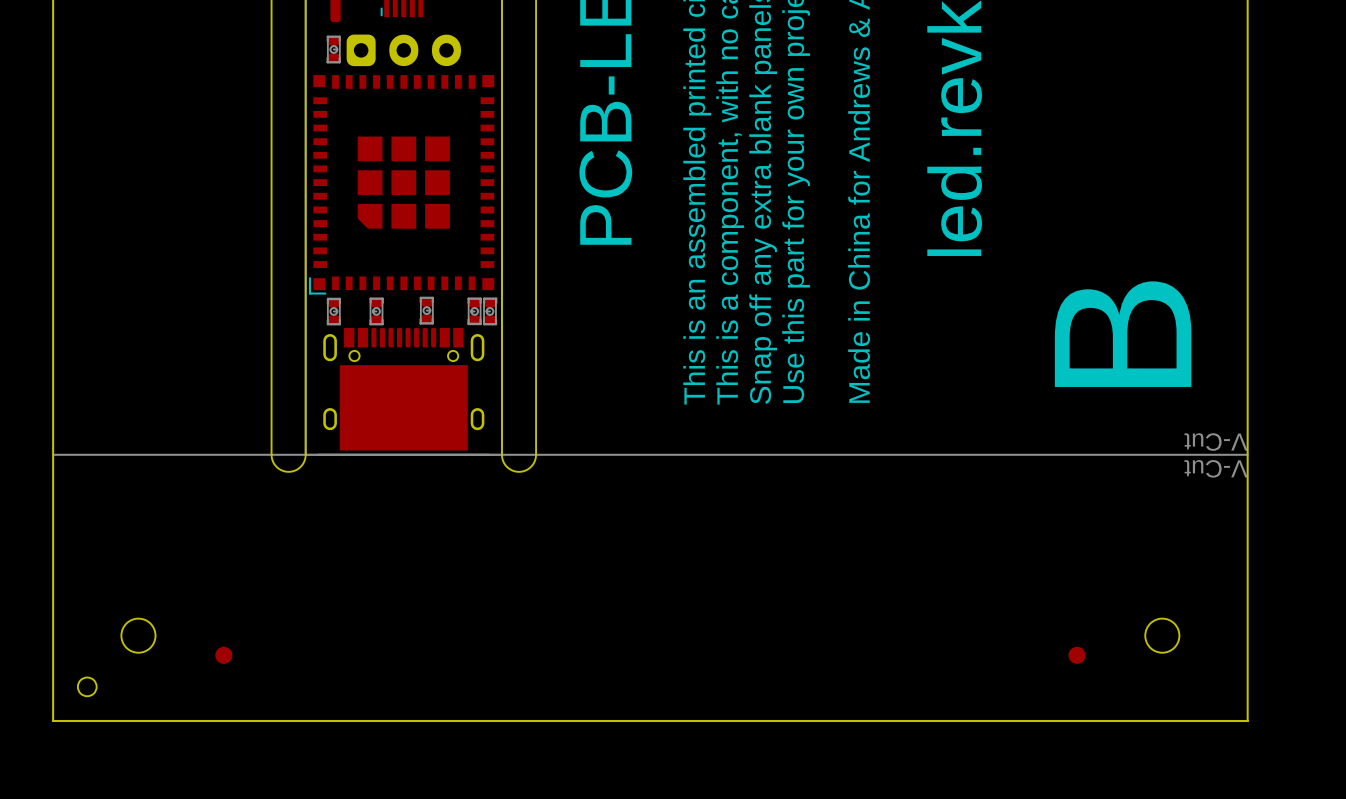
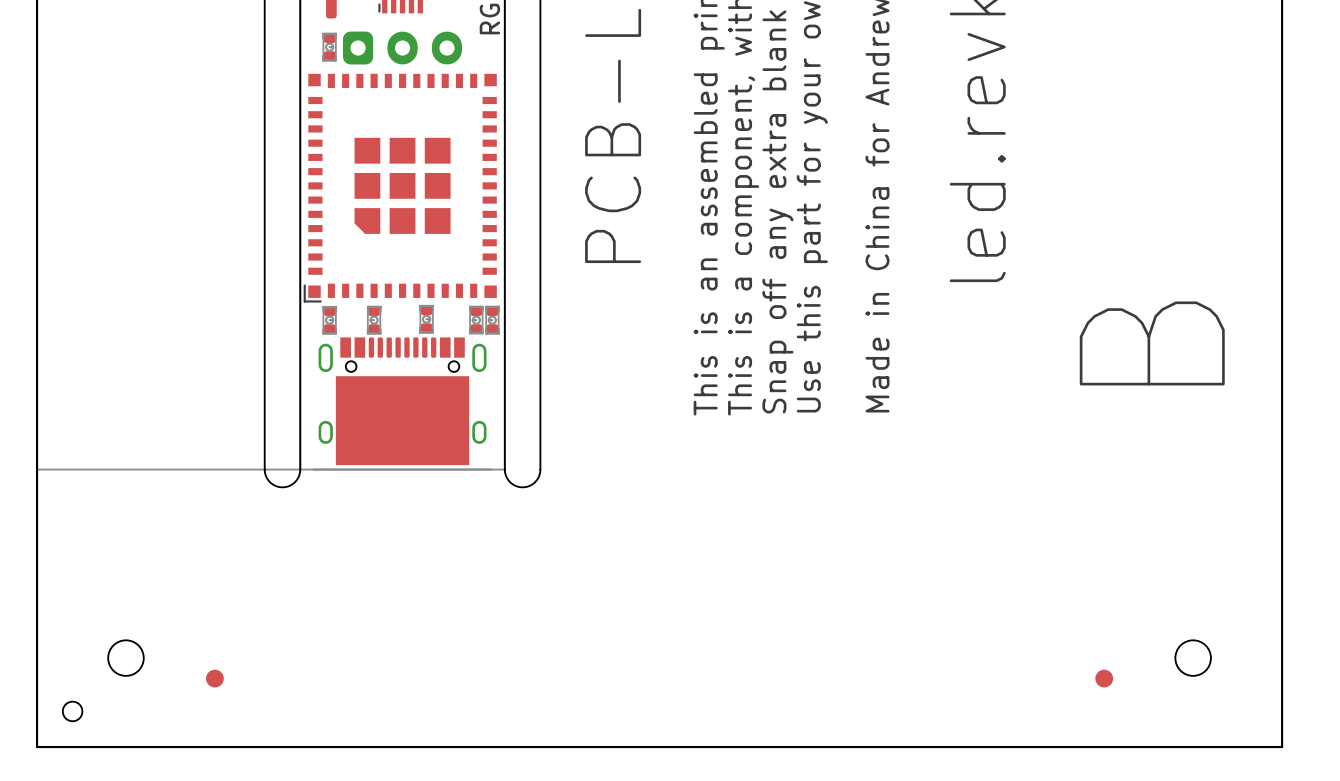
drawing: [52, 453, 1249, 456] -> none

